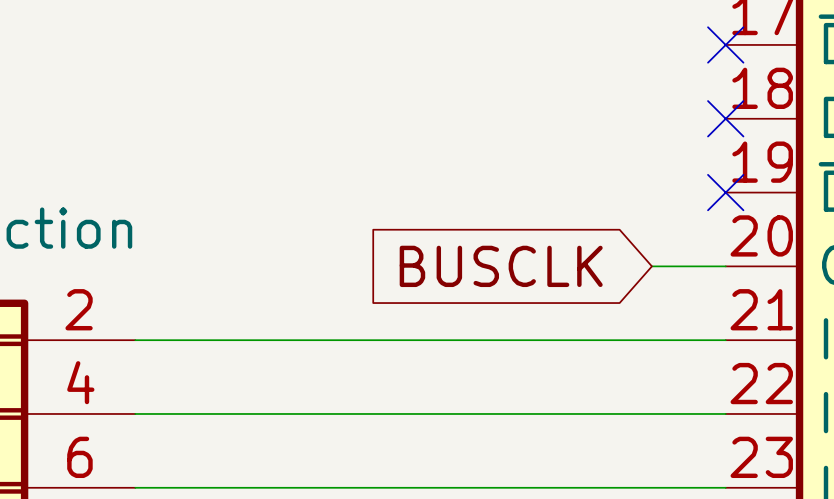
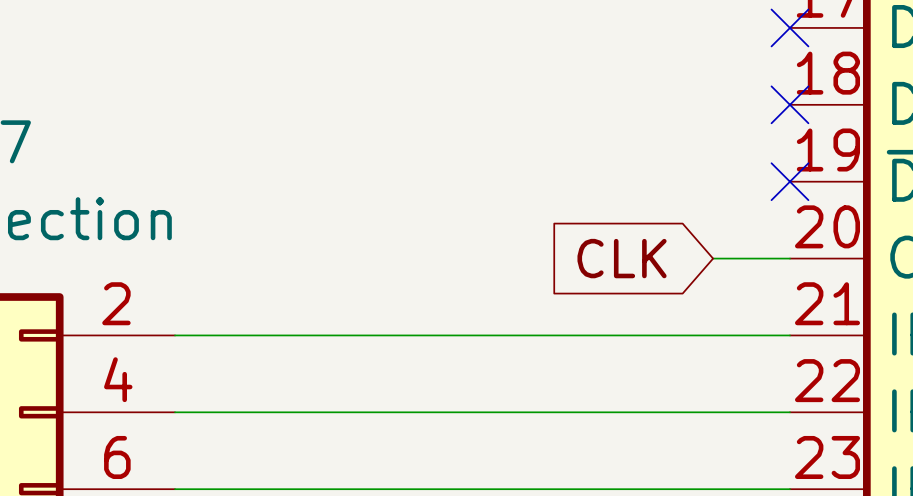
global label: BUSCLK (501, 266) -> CLK (622, 258)

